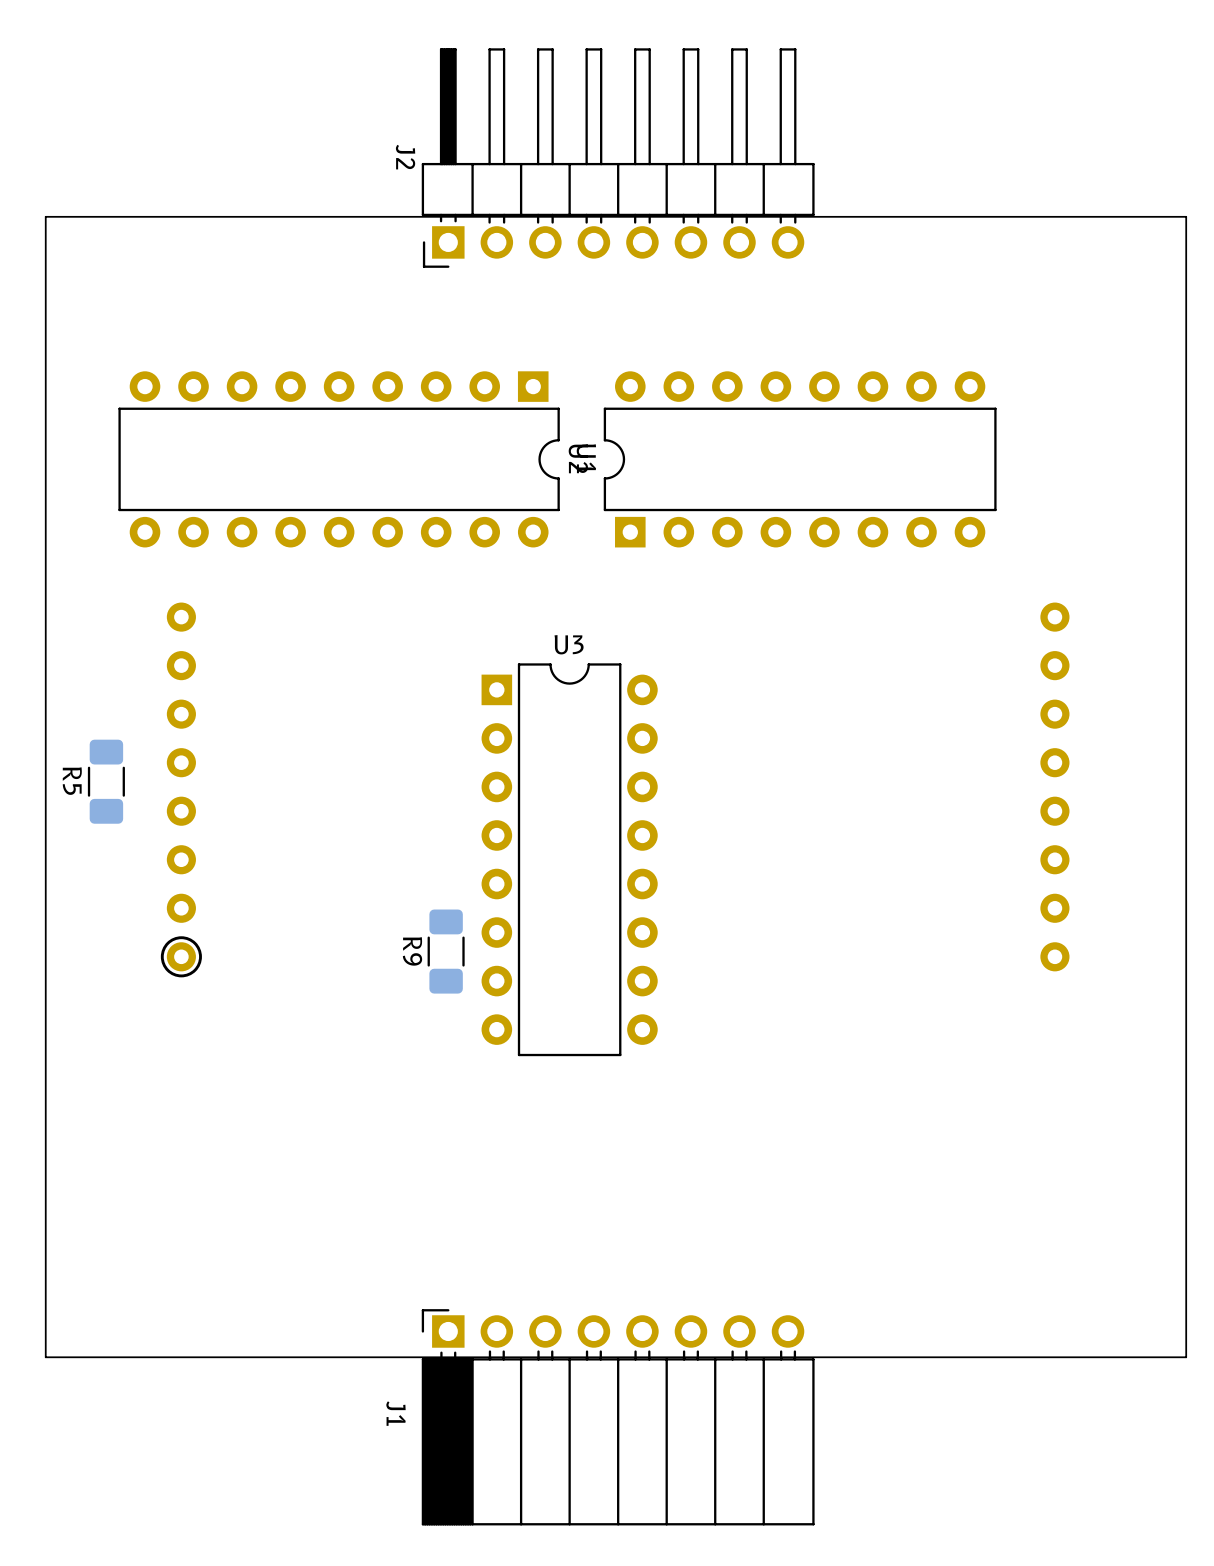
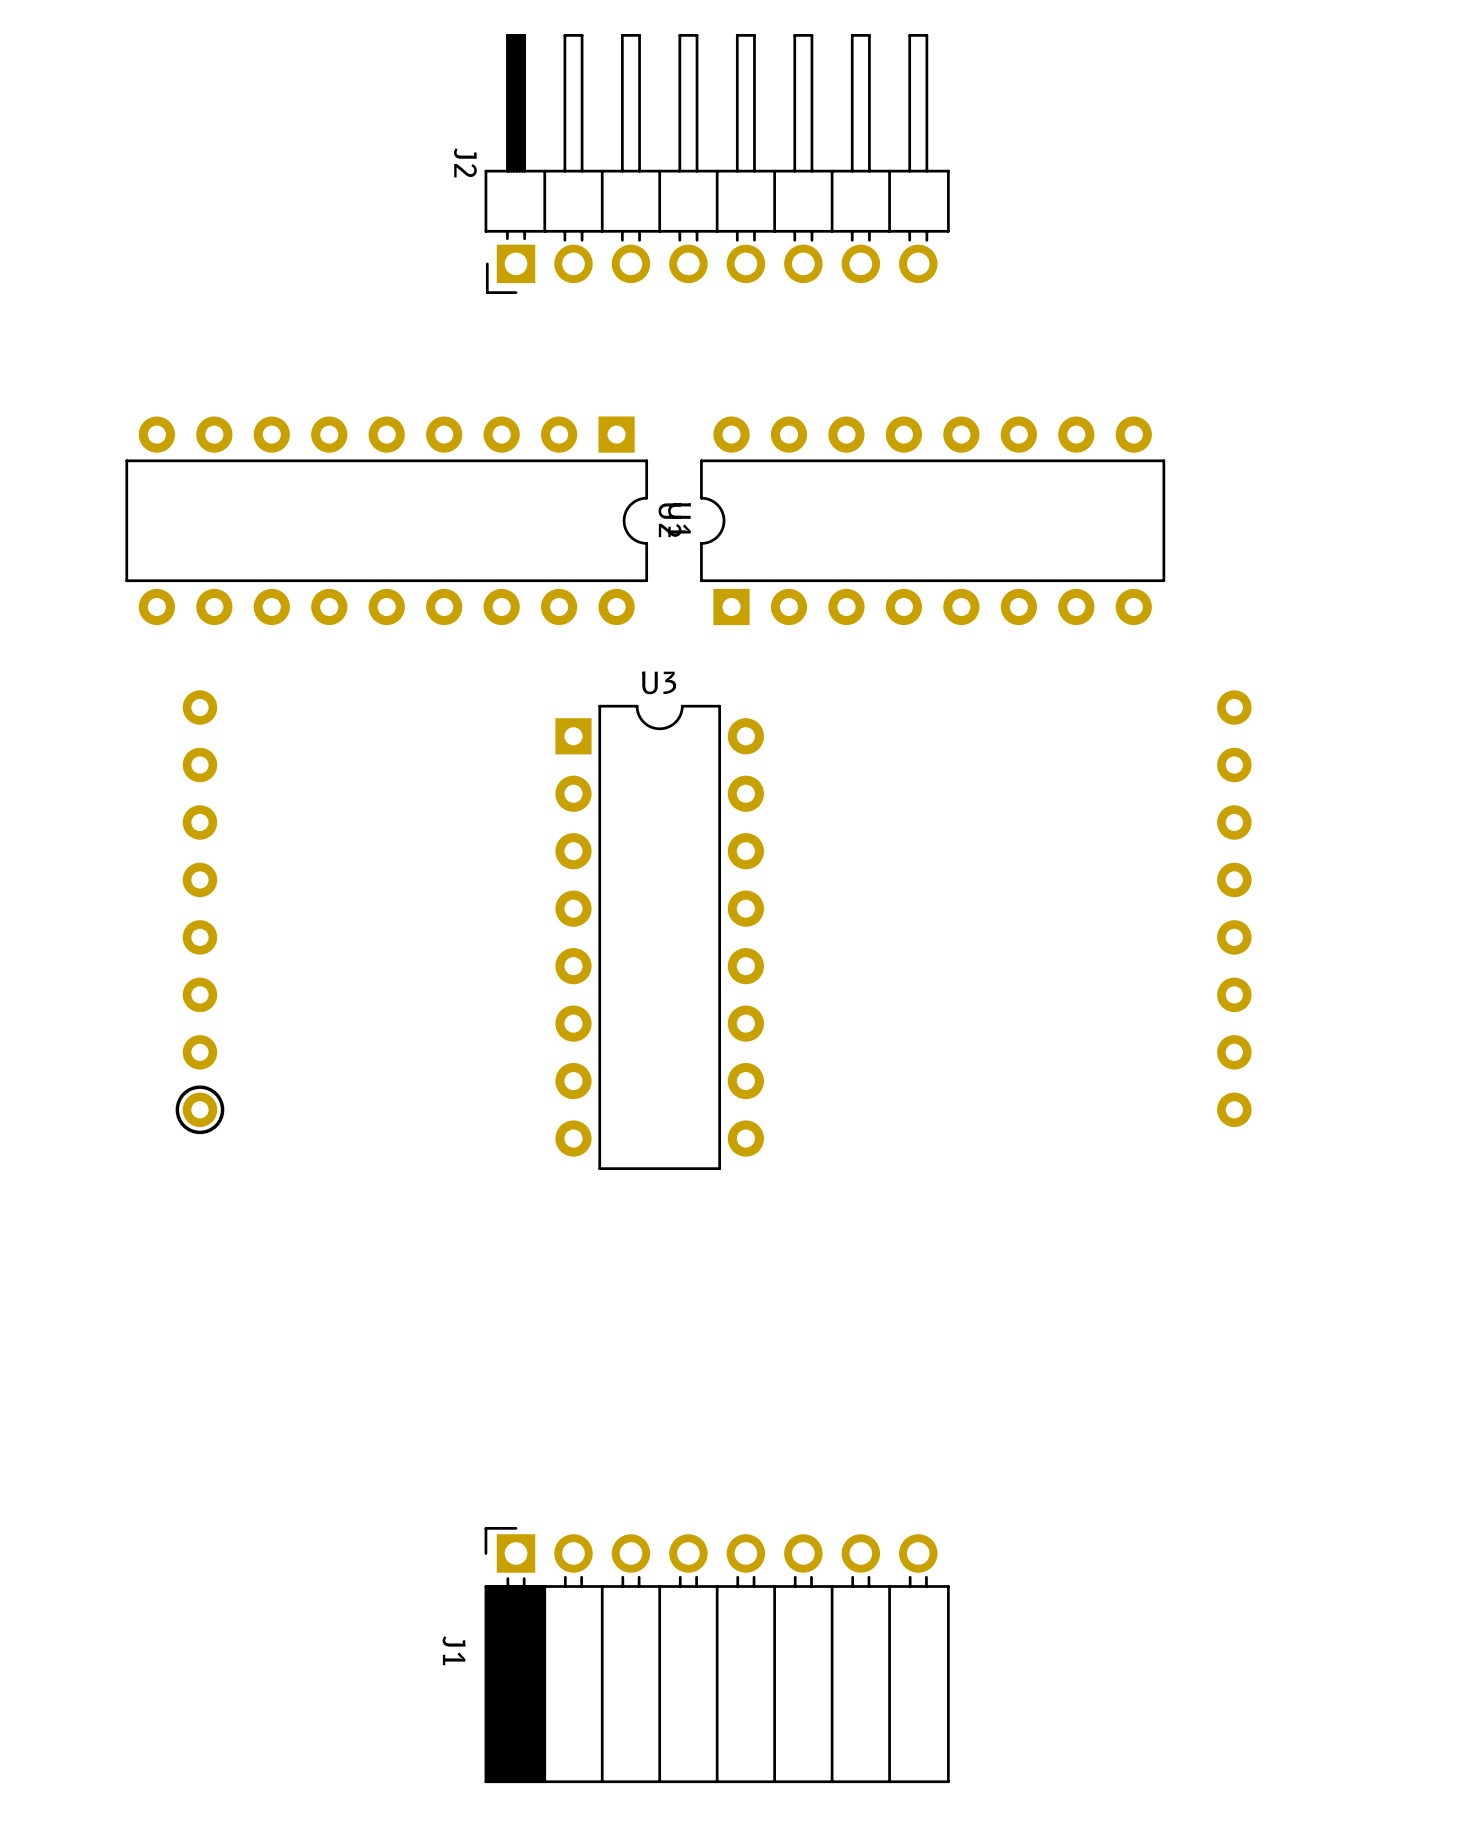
board edge: (1186, 216) (1186, 1357) (45, 1357) (45, 216) (1186, 216) -> none
R5: (106, 781) -> none
U3 position: (569, 859) -> (659, 937)
R9: (446, 951) -> none

